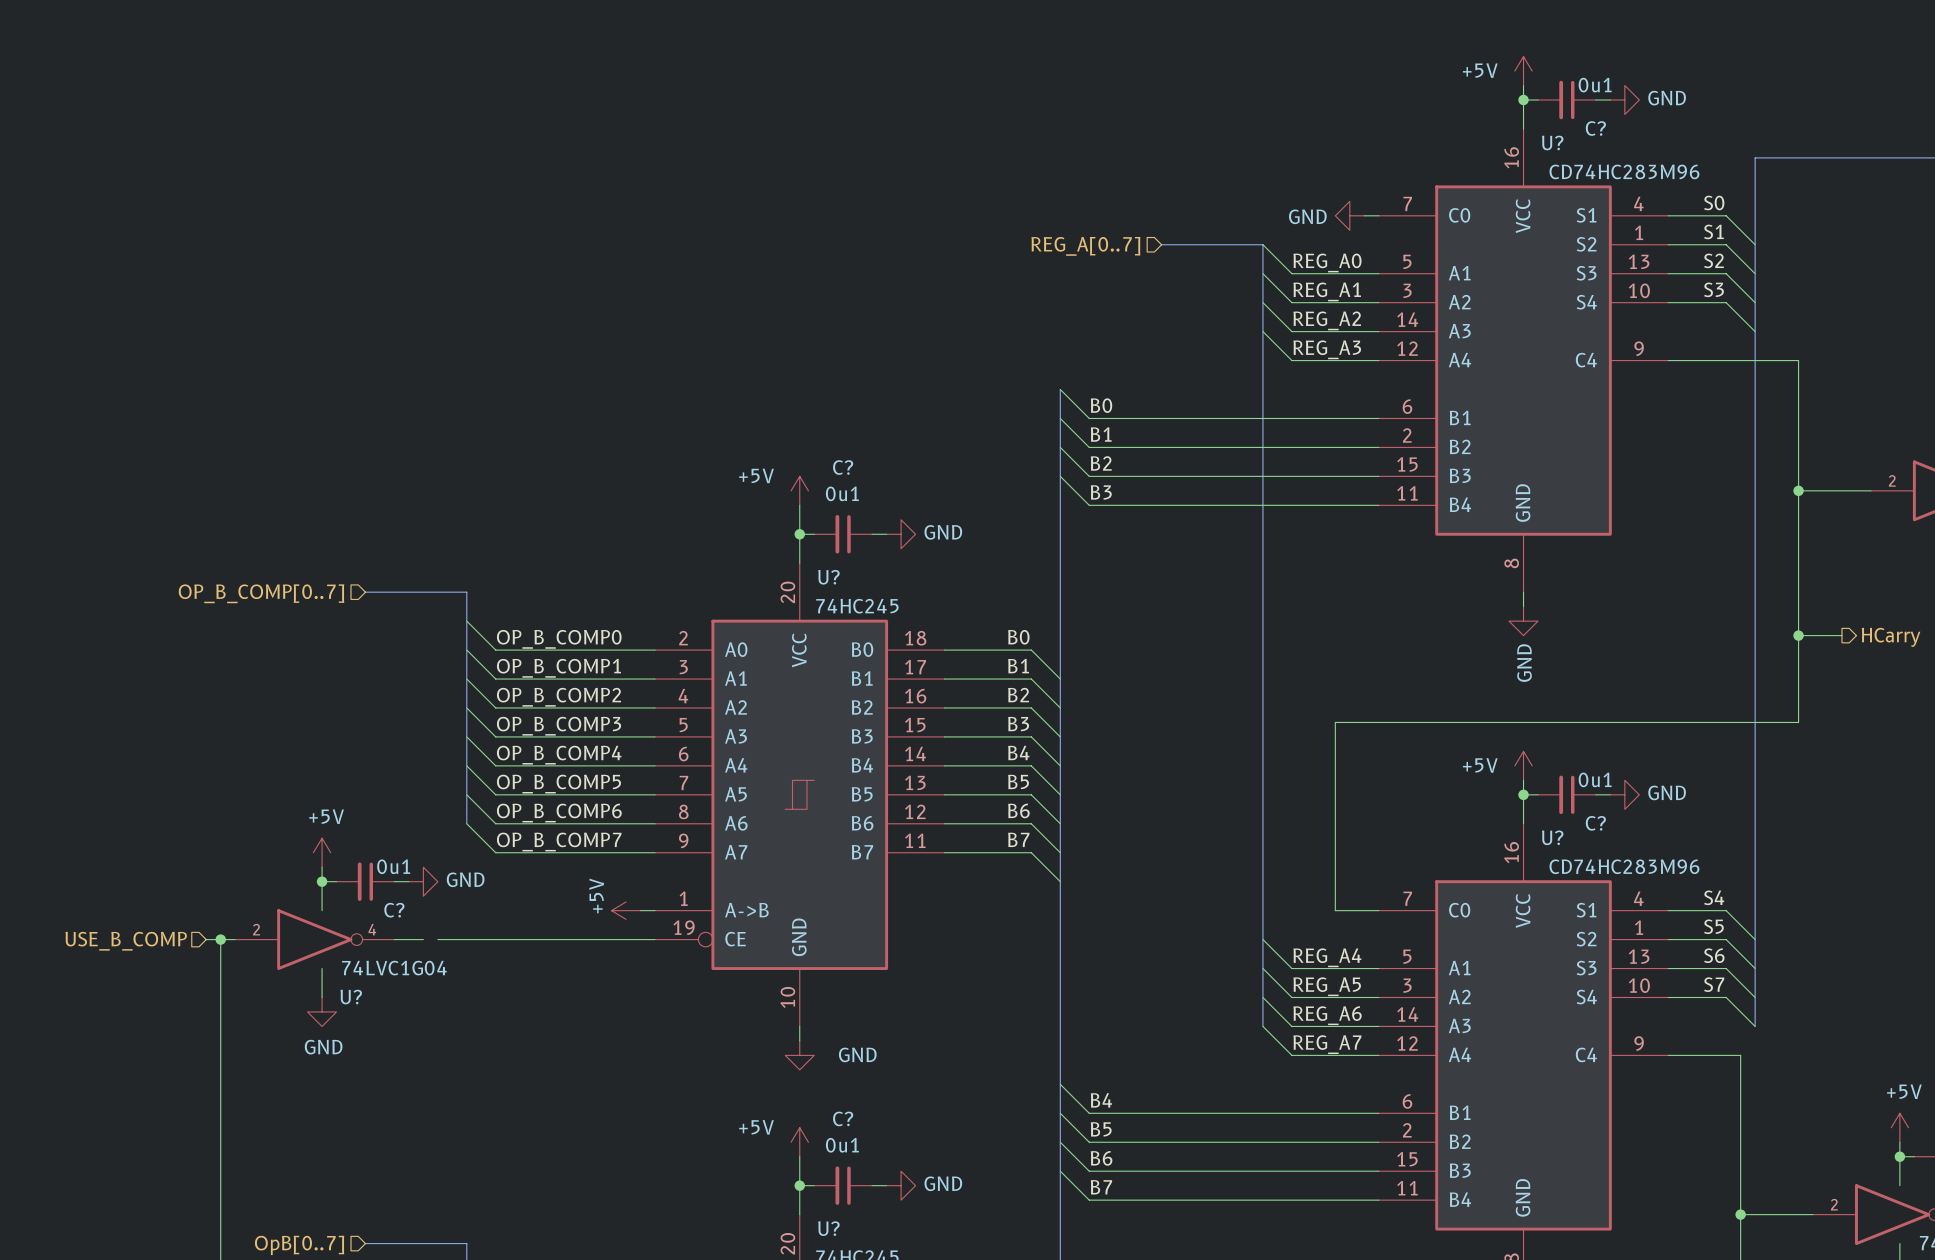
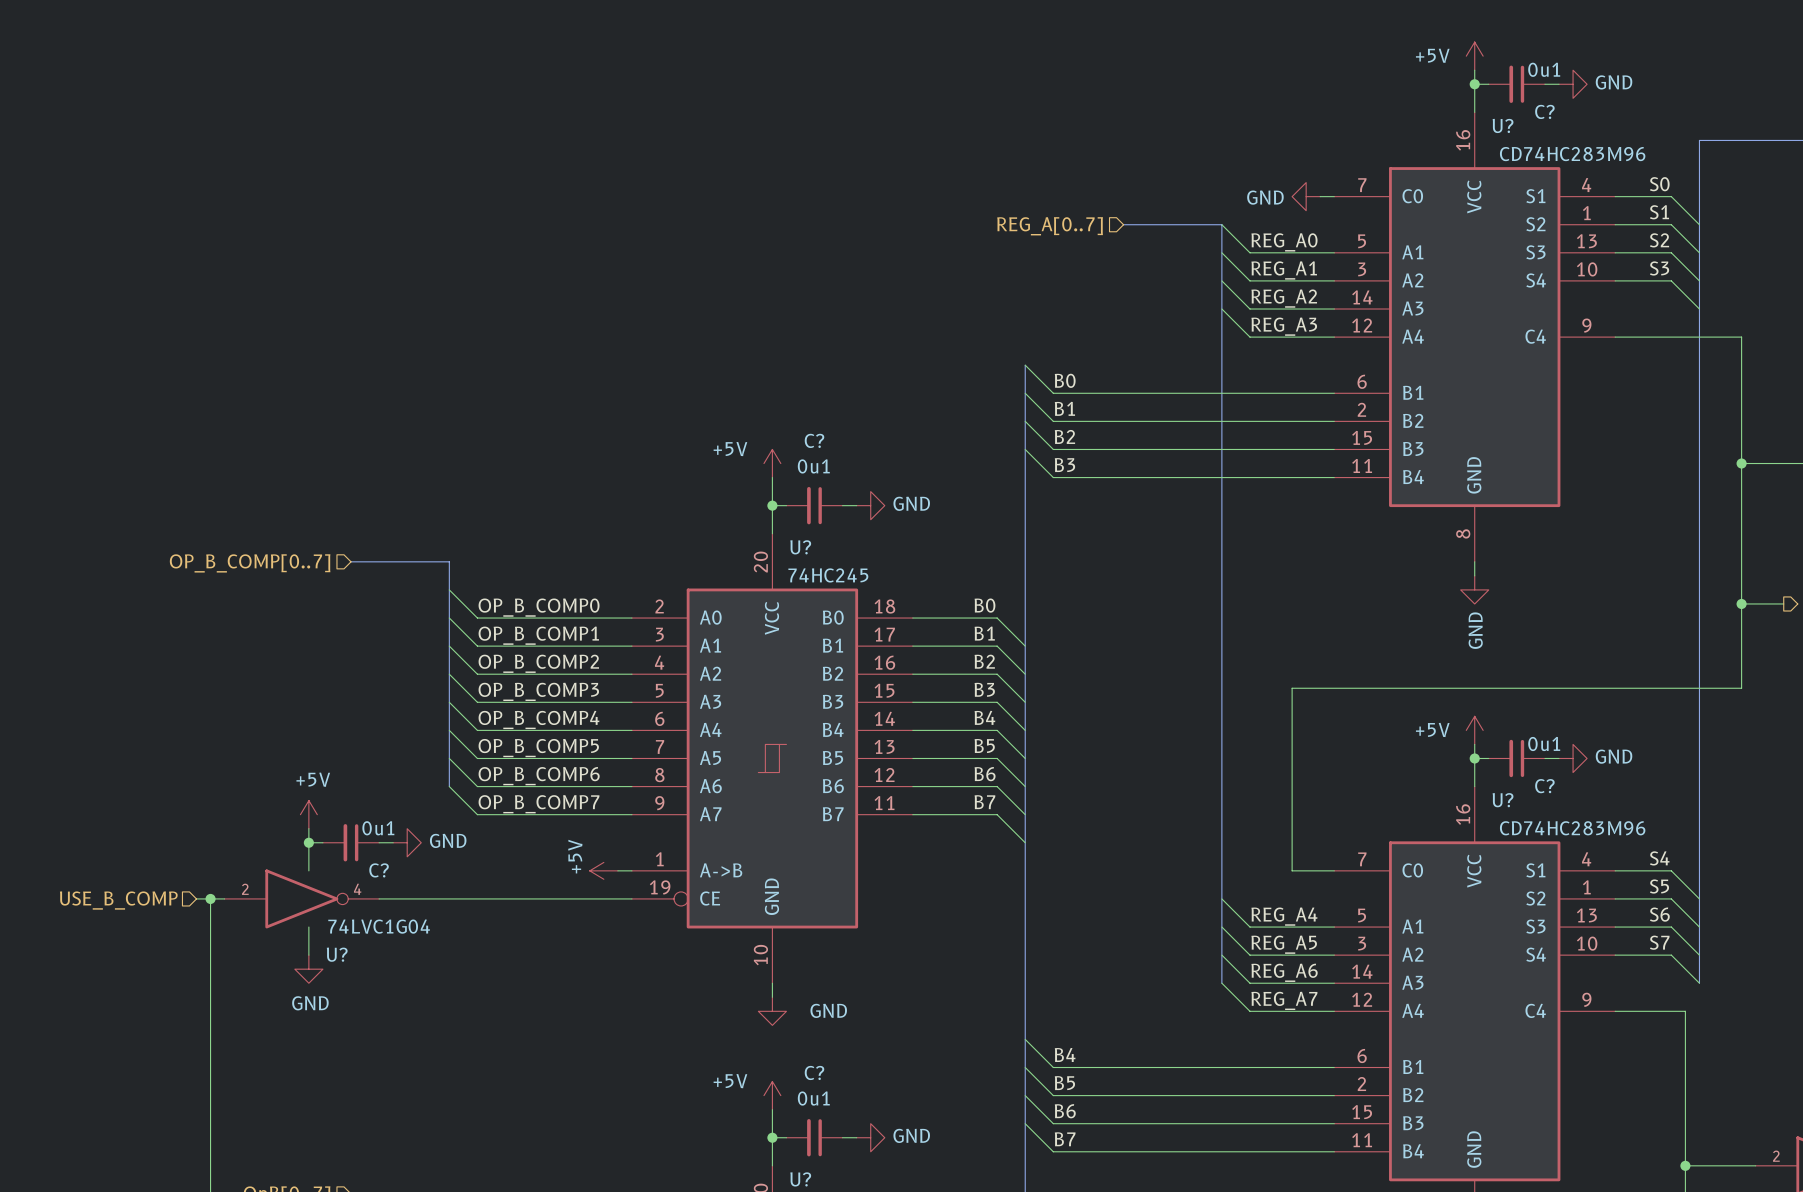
wire: none -> (407, 898) (421, 898)

